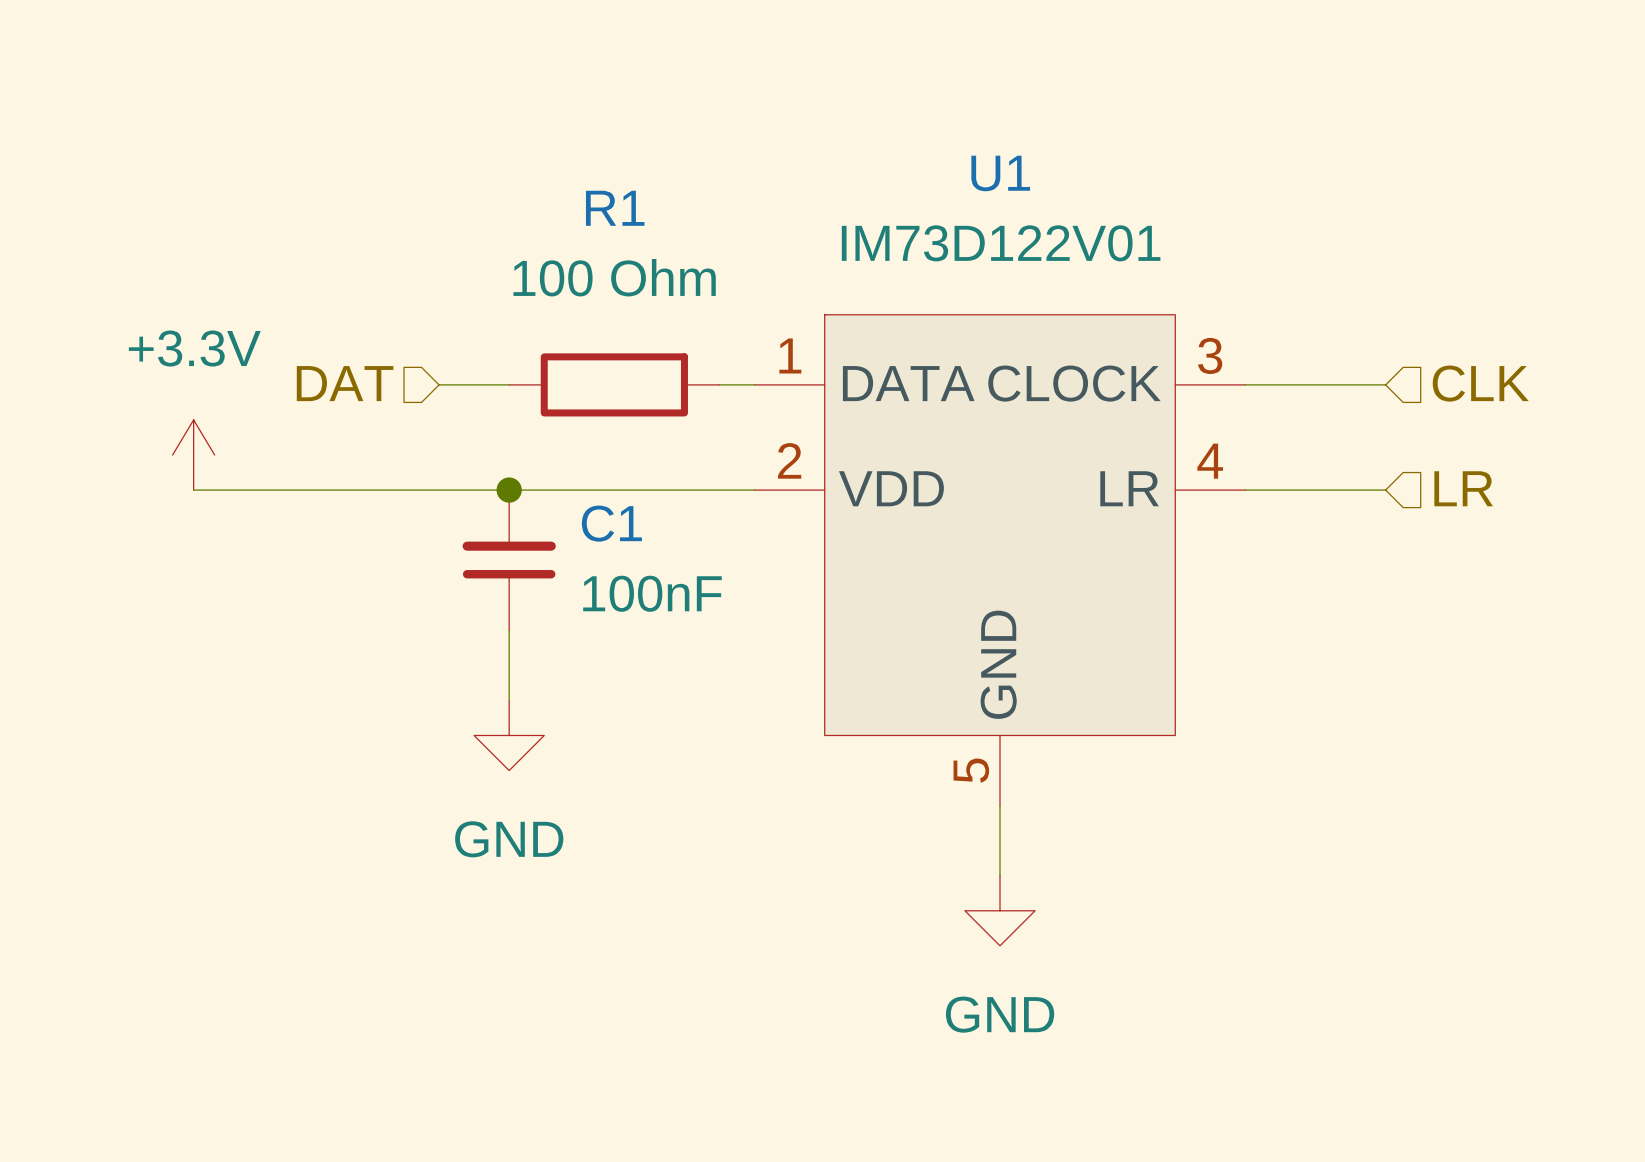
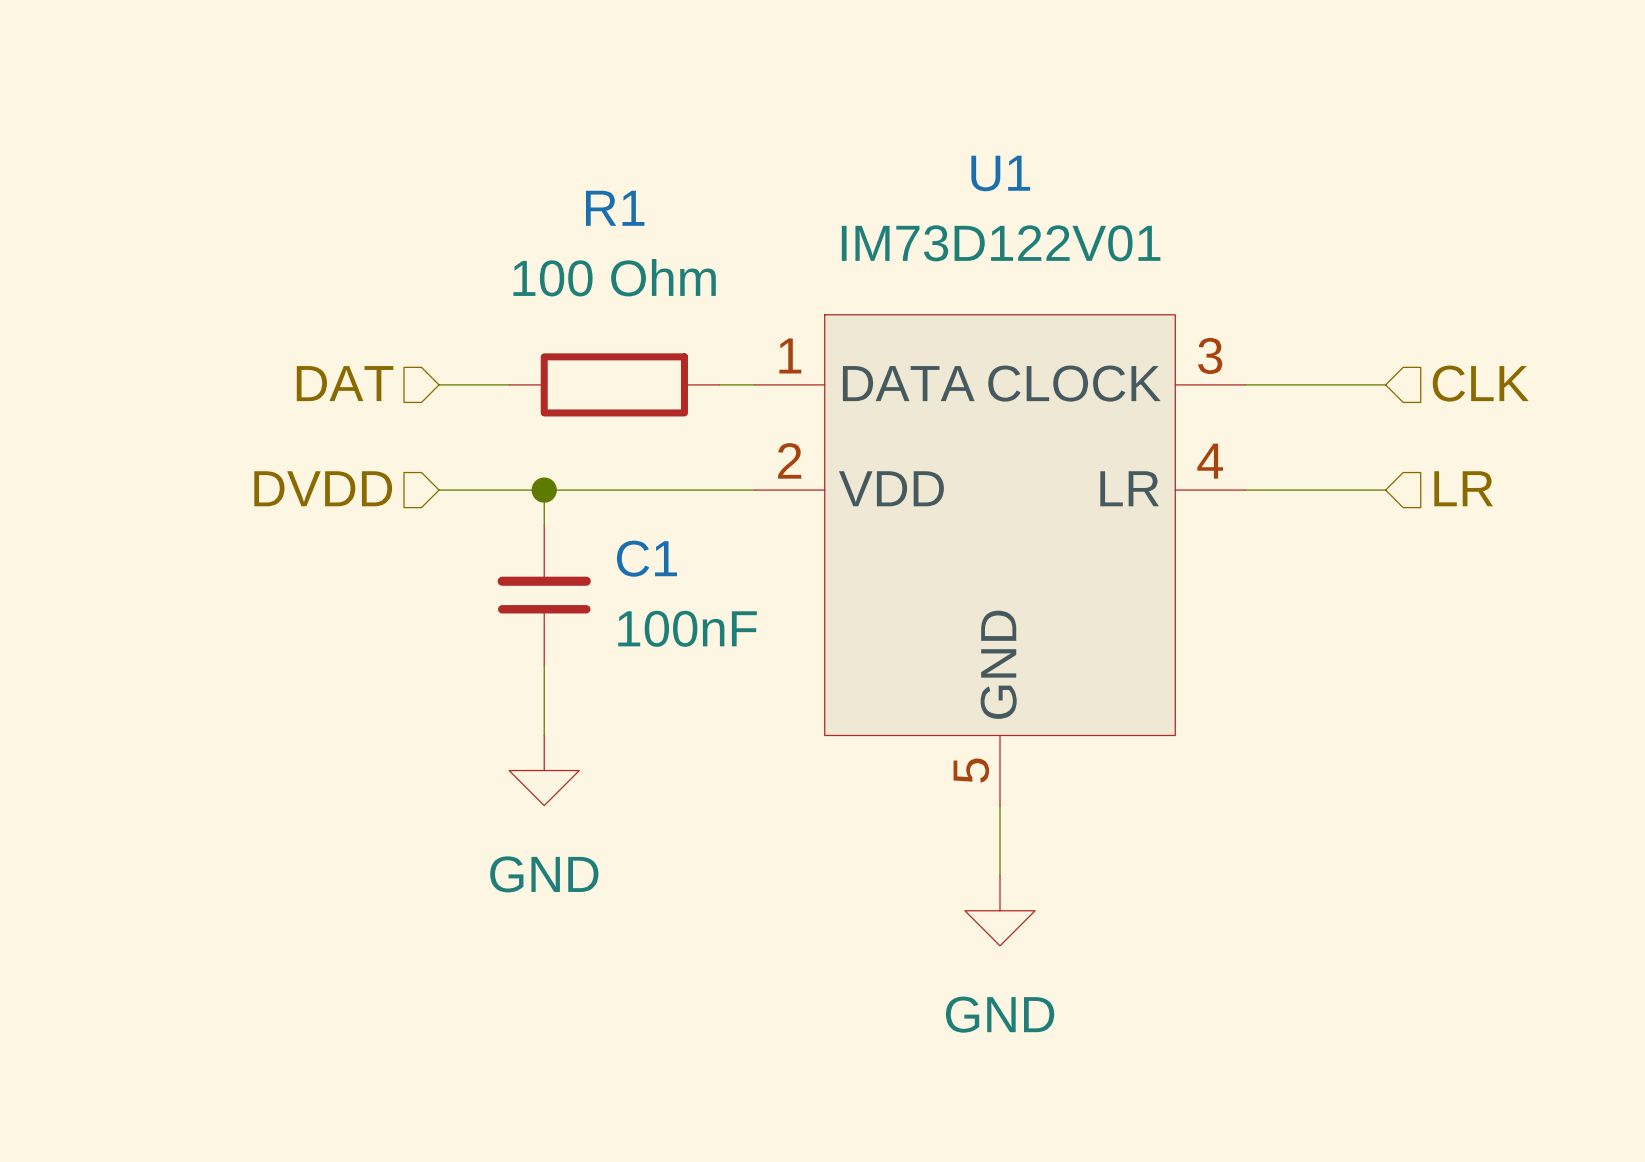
power symbol: +3.3V (193, 455) -> none
hierarchical label: none -> DVDD (323, 488)
wire: (193, 490) (439, 490) -> none
junction position: (509, 490) -> (544, 490)
wire: none -> (544, 490) (544, 525)
C1 position: (509, 560) -> (544, 595)
wire: (509, 630) (509, 700) -> (544, 665) (544, 735)
power symbol position: GND (509, 735) -> GND (544, 770)

